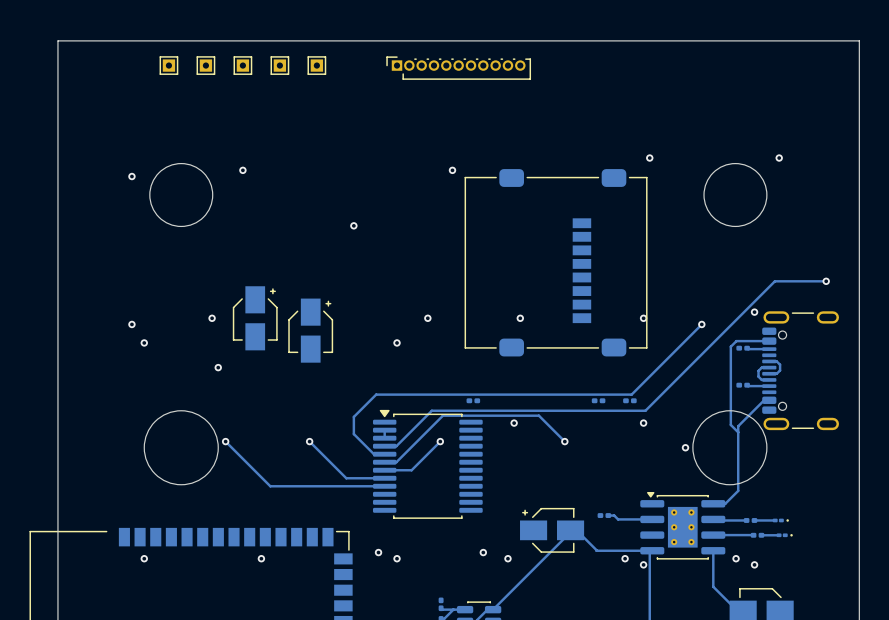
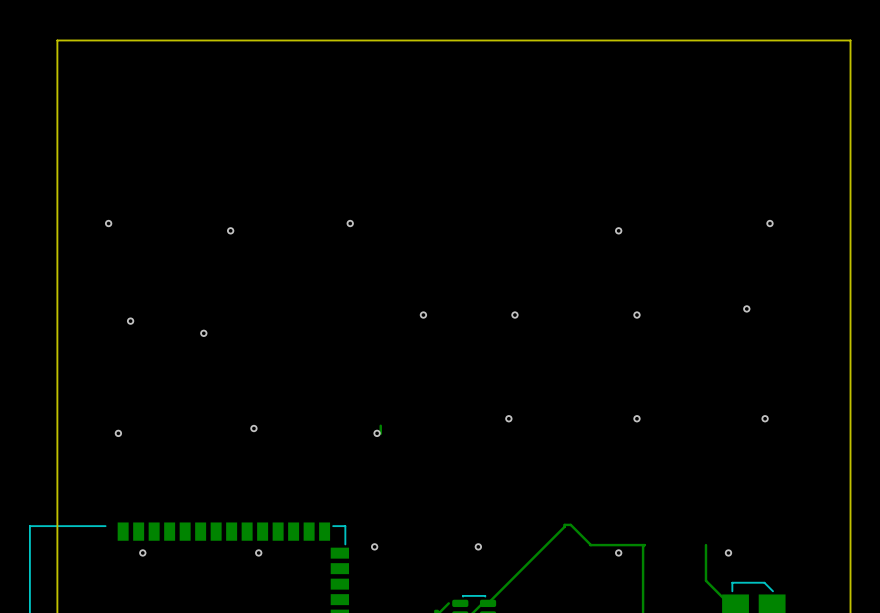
part: (168, 65) -> none
part: (205, 65) -> none
part: (242, 65) -> none
part: (279, 65) -> none
part: (316, 65) -> none
part: (458, 68) -> none
via: (649, 158) -> none
via: (779, 158) -> none
round board edge: [149, 163, 214, 227] -> none
round board edge: [703, 163, 768, 227] -> none
via: (242, 170) -> none
via: (452, 170) -> none
via position: (131, 176) -> (108, 223)
via: none -> (769, 223)
via: none -> (230, 230)
via: none -> (618, 230)
part: (556, 262) -> none
track: (826, 281) (774, 281) (645, 410) (431, 410) (396, 446) (384, 446) -> none
via: (826, 281) -> none
via: (212, 318) -> none
part: (255, 318) -> none
track: (701, 324) (631, 394) (376, 394) (353, 416) (353, 434) (373, 454) (384, 454) -> none
via: (701, 324) -> none
part: (310, 330) -> none
via: none -> (203, 333)
track: (769, 341) (736, 341) (730, 346) (730, 424) (738, 432) -> none
via: (144, 342) -> none
via: (397, 342) -> none
part: (743, 348) -> none
track: (747, 348) (769, 349) -> none
track: (769, 361) (776, 361) (780, 364) (780, 370) (776, 373) (769, 373) -> none
via: (218, 367) -> none
track: (769, 367) (761, 367) (758, 370) (758, 376) (761, 379) (769, 379) -> none
part: (800, 370) -> none
part: (743, 385) -> none
track: (747, 385) (769, 386) -> none
part: (473, 400) -> none
part: (598, 400) -> none
part: (629, 400) -> none
track: (769, 400) (764, 400) (738, 426) (738, 490) (725, 503) (713, 503) -> none
round board edge: [143, 410, 219, 486] -> none
round board edge: [692, 410, 768, 486] -> none
via: none -> (253, 428)
via: none -> (118, 433)
via: none -> (377, 433)
track: (225, 441) (270, 486) (384, 486) -> none
via: (225, 441) -> none
track: (309, 441) (346, 478) (384, 478) -> none
via: (309, 441) -> none
track: (440, 441) (411, 470) (384, 470) -> none
via: (440, 441) -> none
track: (564, 441) (538, 415) (442, 415) (396, 462) (384, 462) -> none
via: (564, 441) -> none
via: (685, 447) -> none
part: (427, 464) -> none
part: (604, 515) -> none
track: (608, 515) (614, 515) (618, 519) (651, 519) -> none
track: (713, 519) (746, 520) -> none
part: (750, 520) -> none
track: (775, 520) (754, 520) -> none
part: (780, 520) -> none
part: (682, 525) -> none
part: (552, 530) -> none
track: (752, 535) (713, 535) -> none
part: (757, 535) -> none
track: (779, 535) (761, 535) -> none
part: (784, 535) -> none
via: (397, 558) -> none
via: (507, 558) -> none
via: (643, 564) -> none
via: (754, 564) -> none
part: (441, 604) -> none
track: (441, 608) (465, 609) -> none

